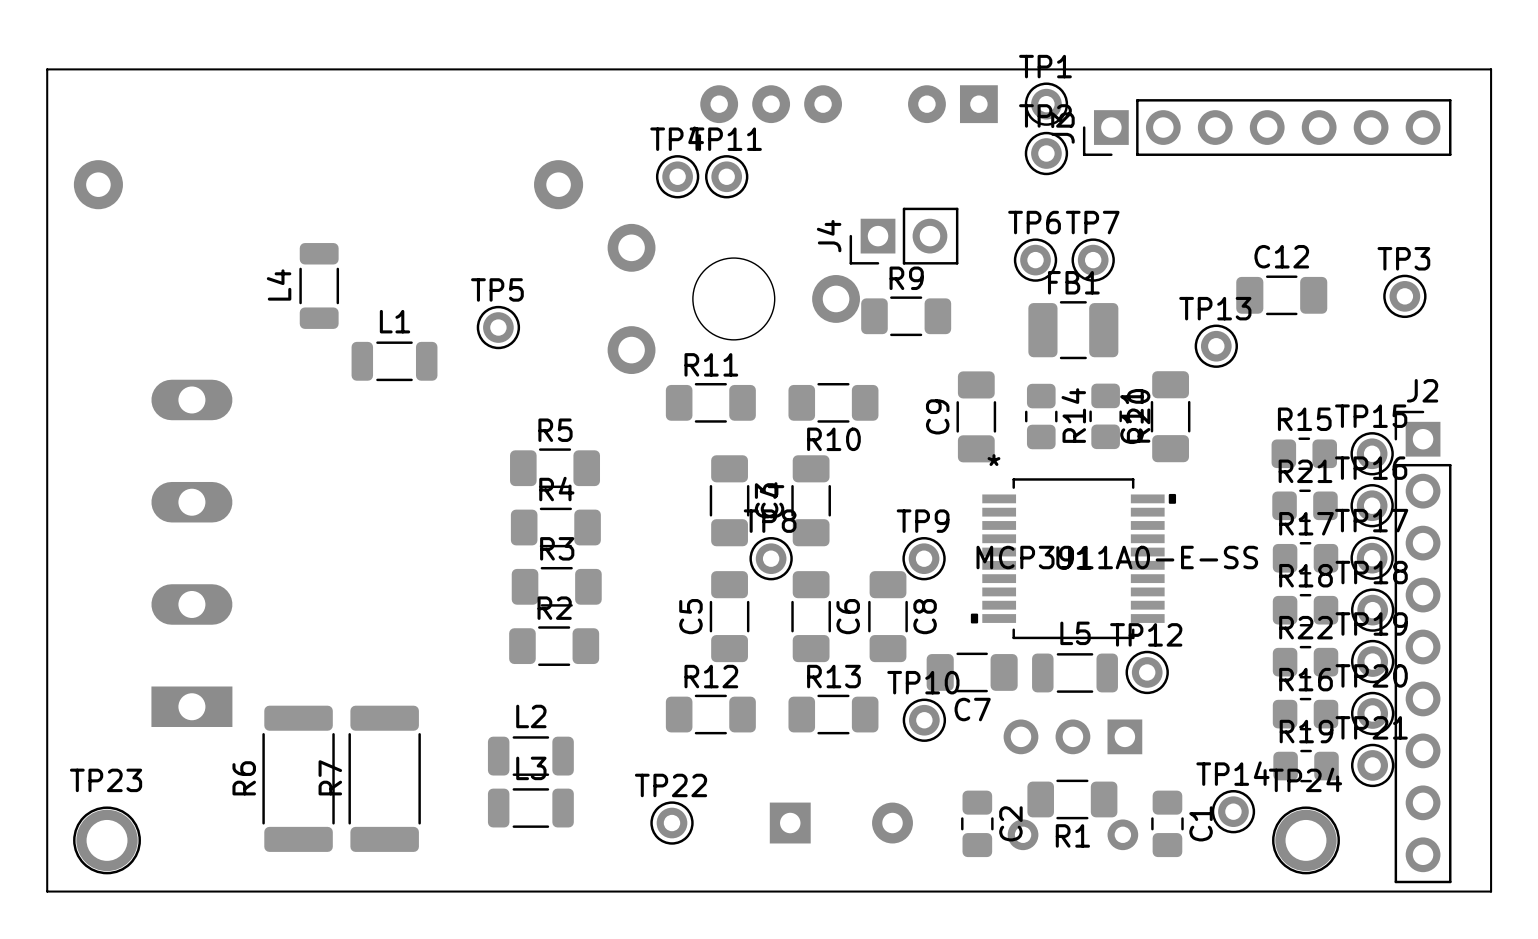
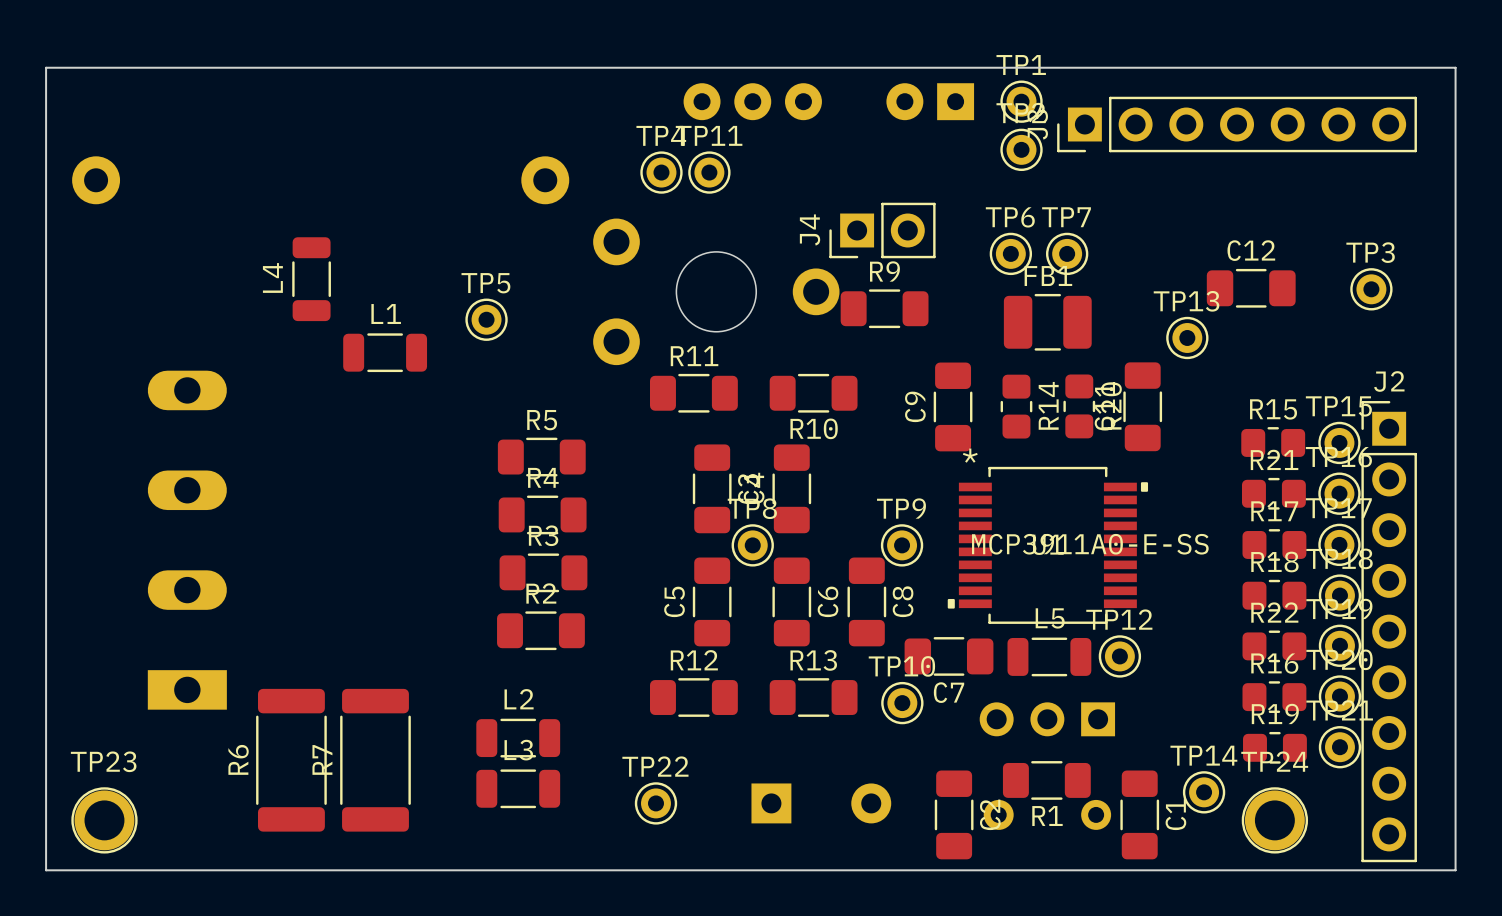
C2 footprint: [961, 790, 994, 858] -> [934, 770, 974, 860]
C1 footprint: [1151, 790, 1184, 858] -> [1120, 770, 1160, 860]

